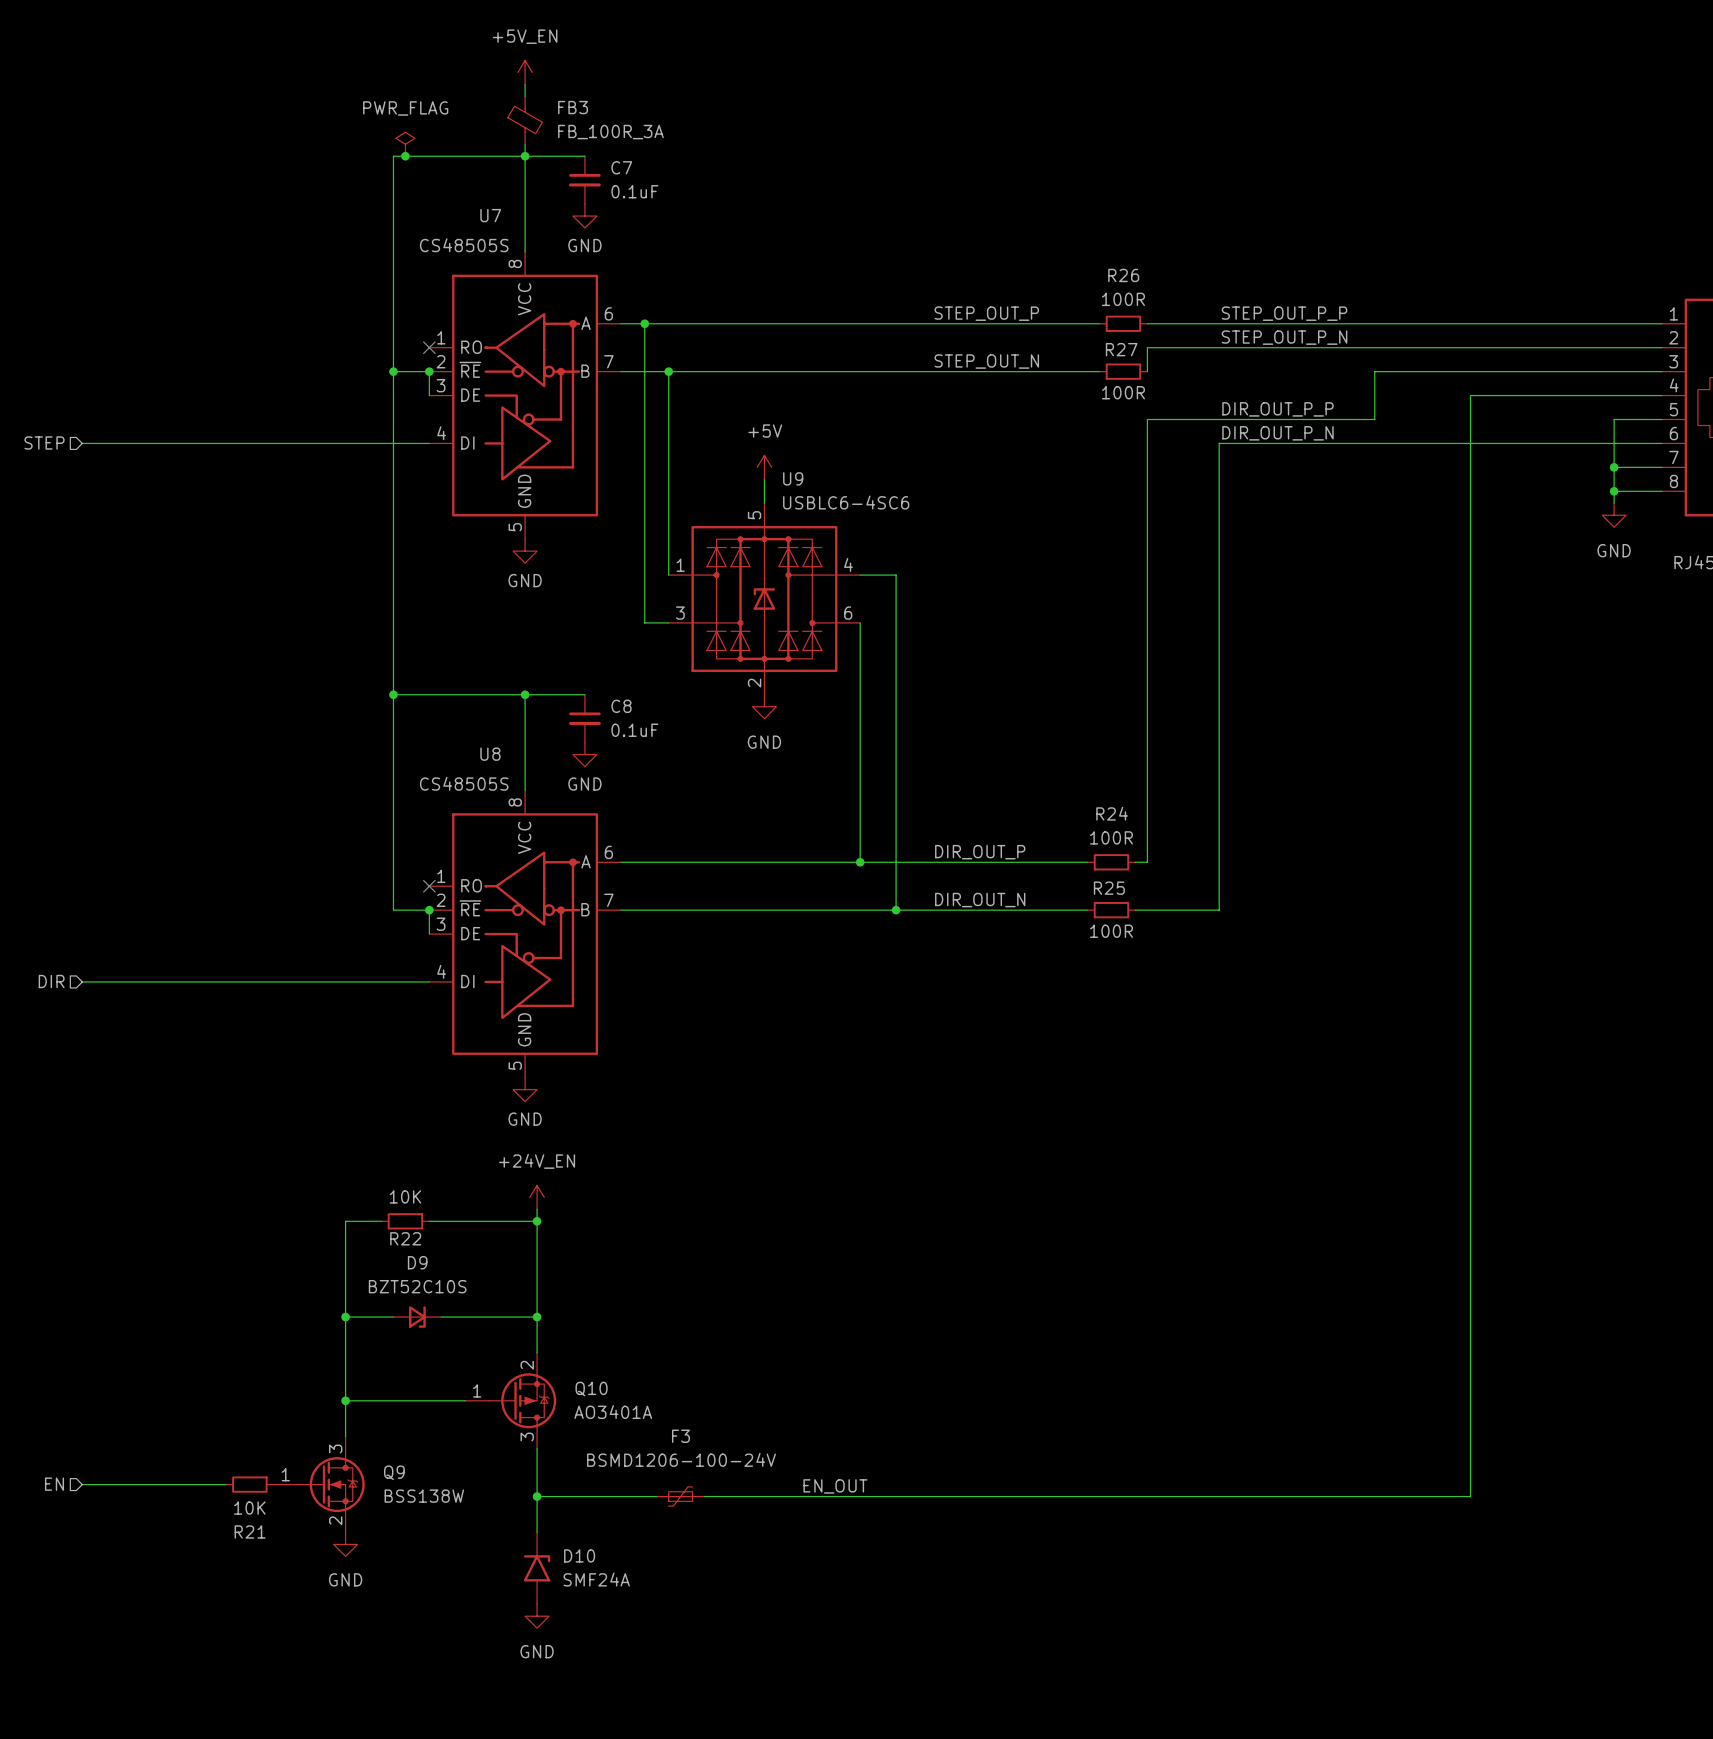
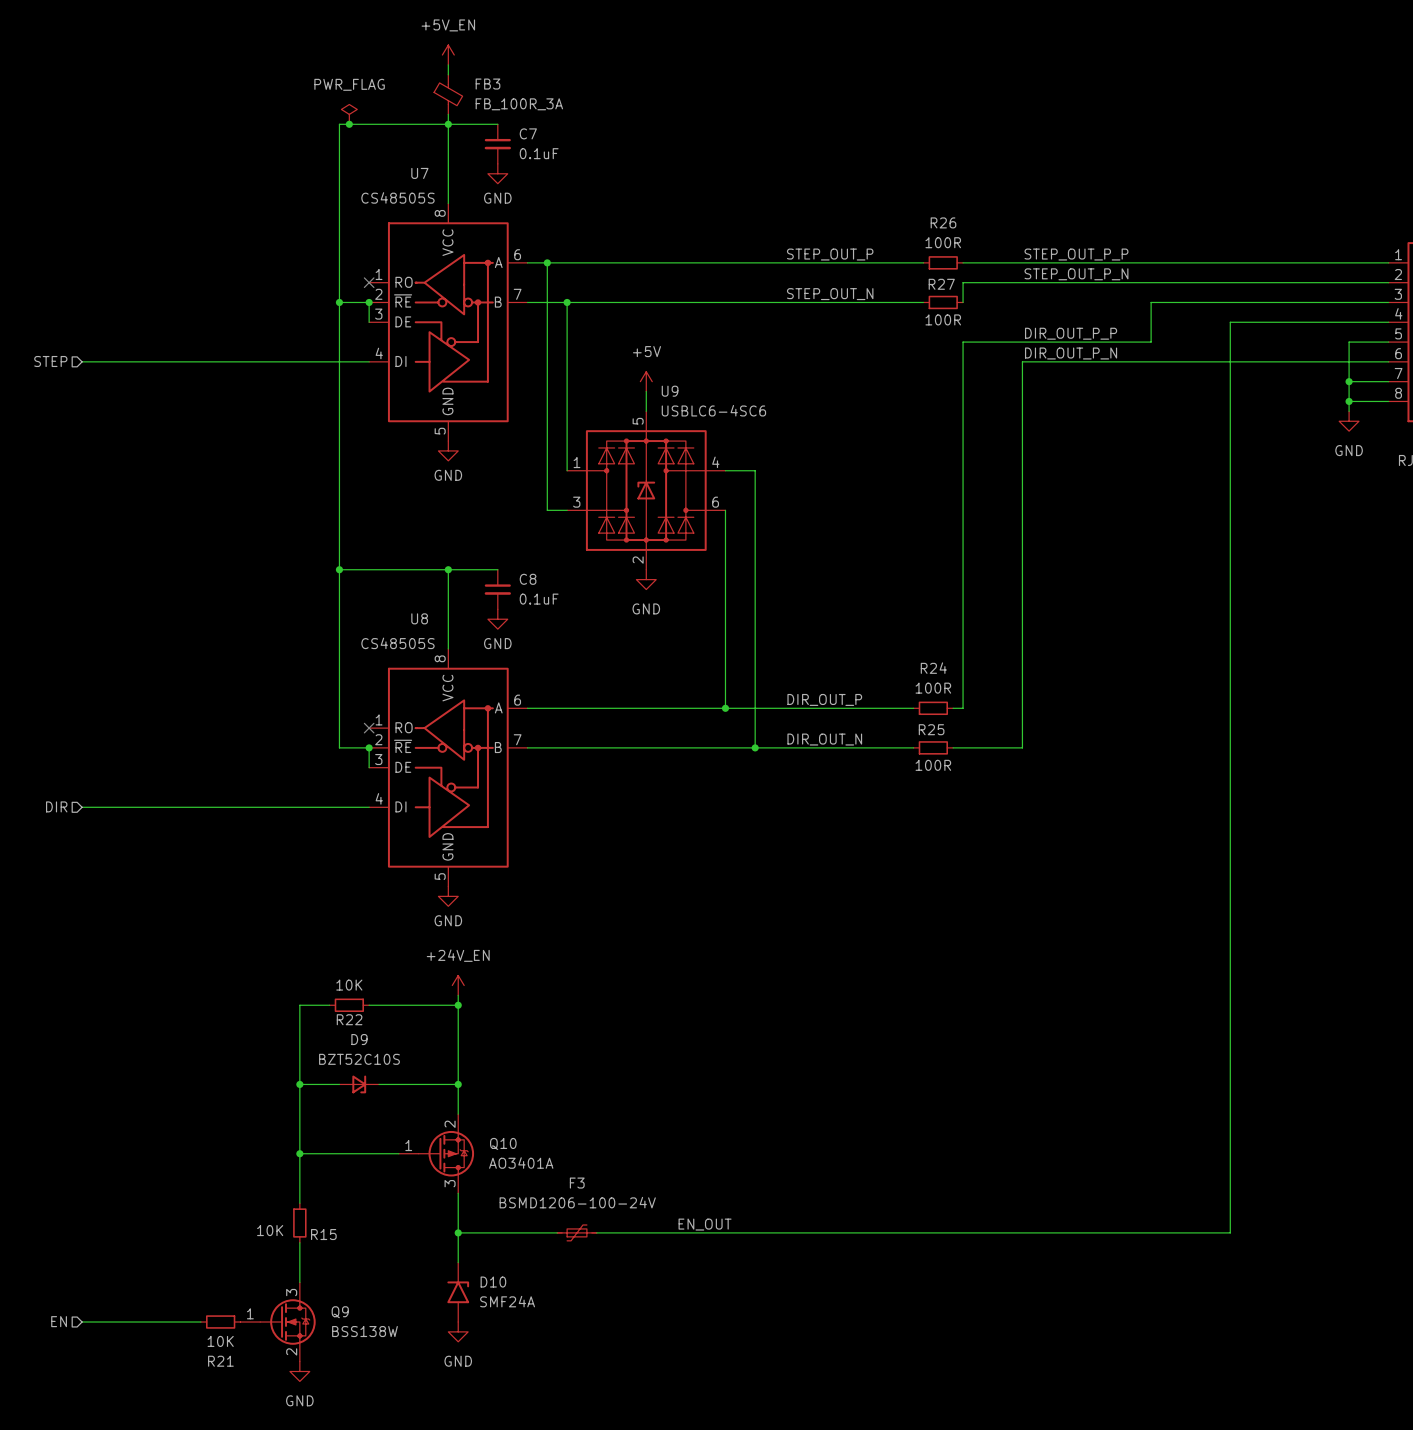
hierarchical label position: EN (54, 1484) -> EN (59, 1321)
wire: (82, 1484) (225, 1484) -> (82, 1322) (200, 1322)
R21 position: (249, 1484) -> (220, 1322)
Q9 position: (319, 1484) -> (278, 1322)
R15: none -> 10K (299, 1223)
power symbol position: GND (345, 1544) -> GND (299, 1371)

